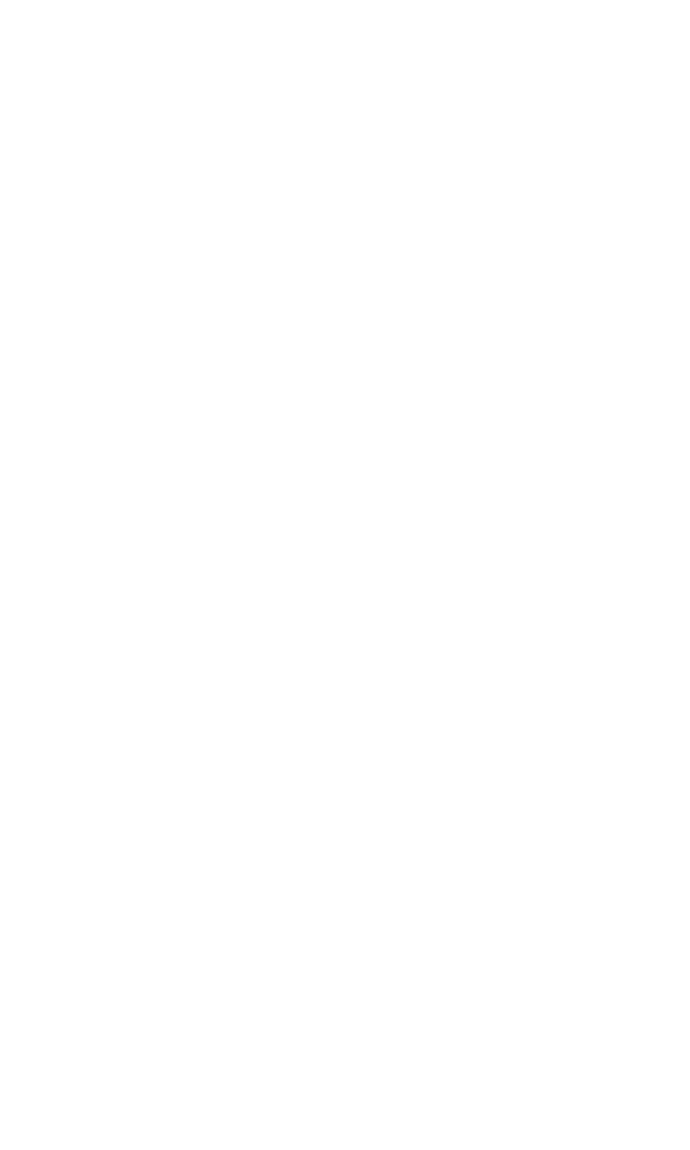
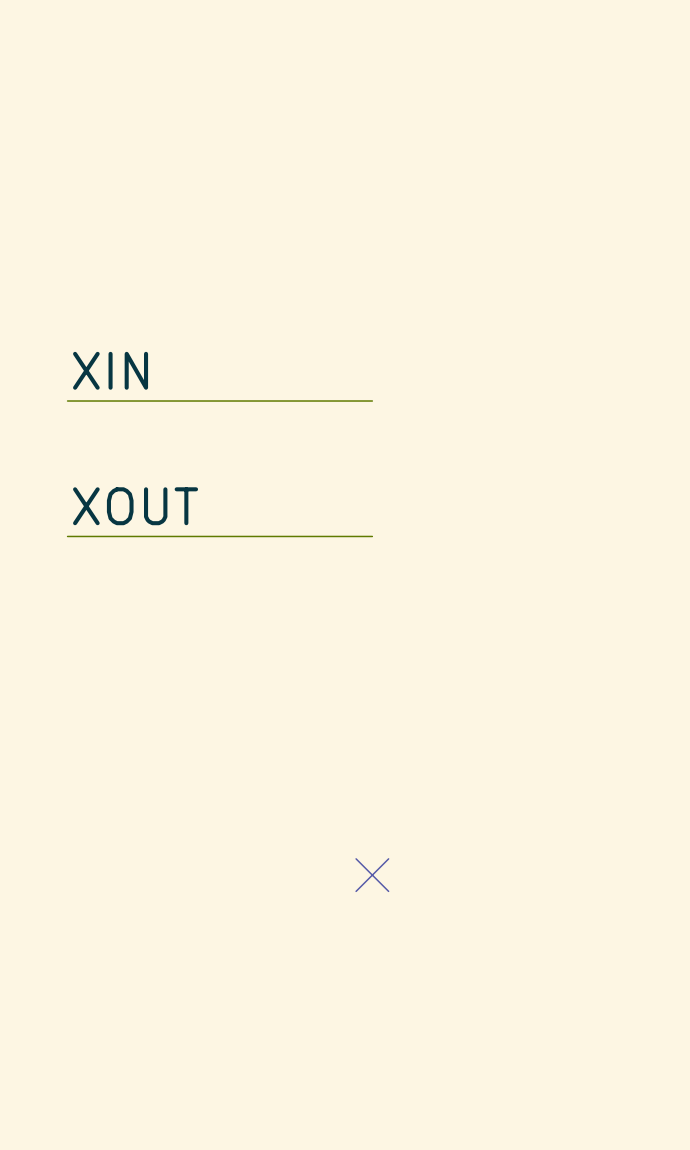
label: none -> XIN (110, 370)
wire: none -> (67, 401) (372, 401)
label: none -> XOUT (135, 506)
wire: none -> (67, 536) (372, 536)
no-connect mark: none -> (372, 875)

